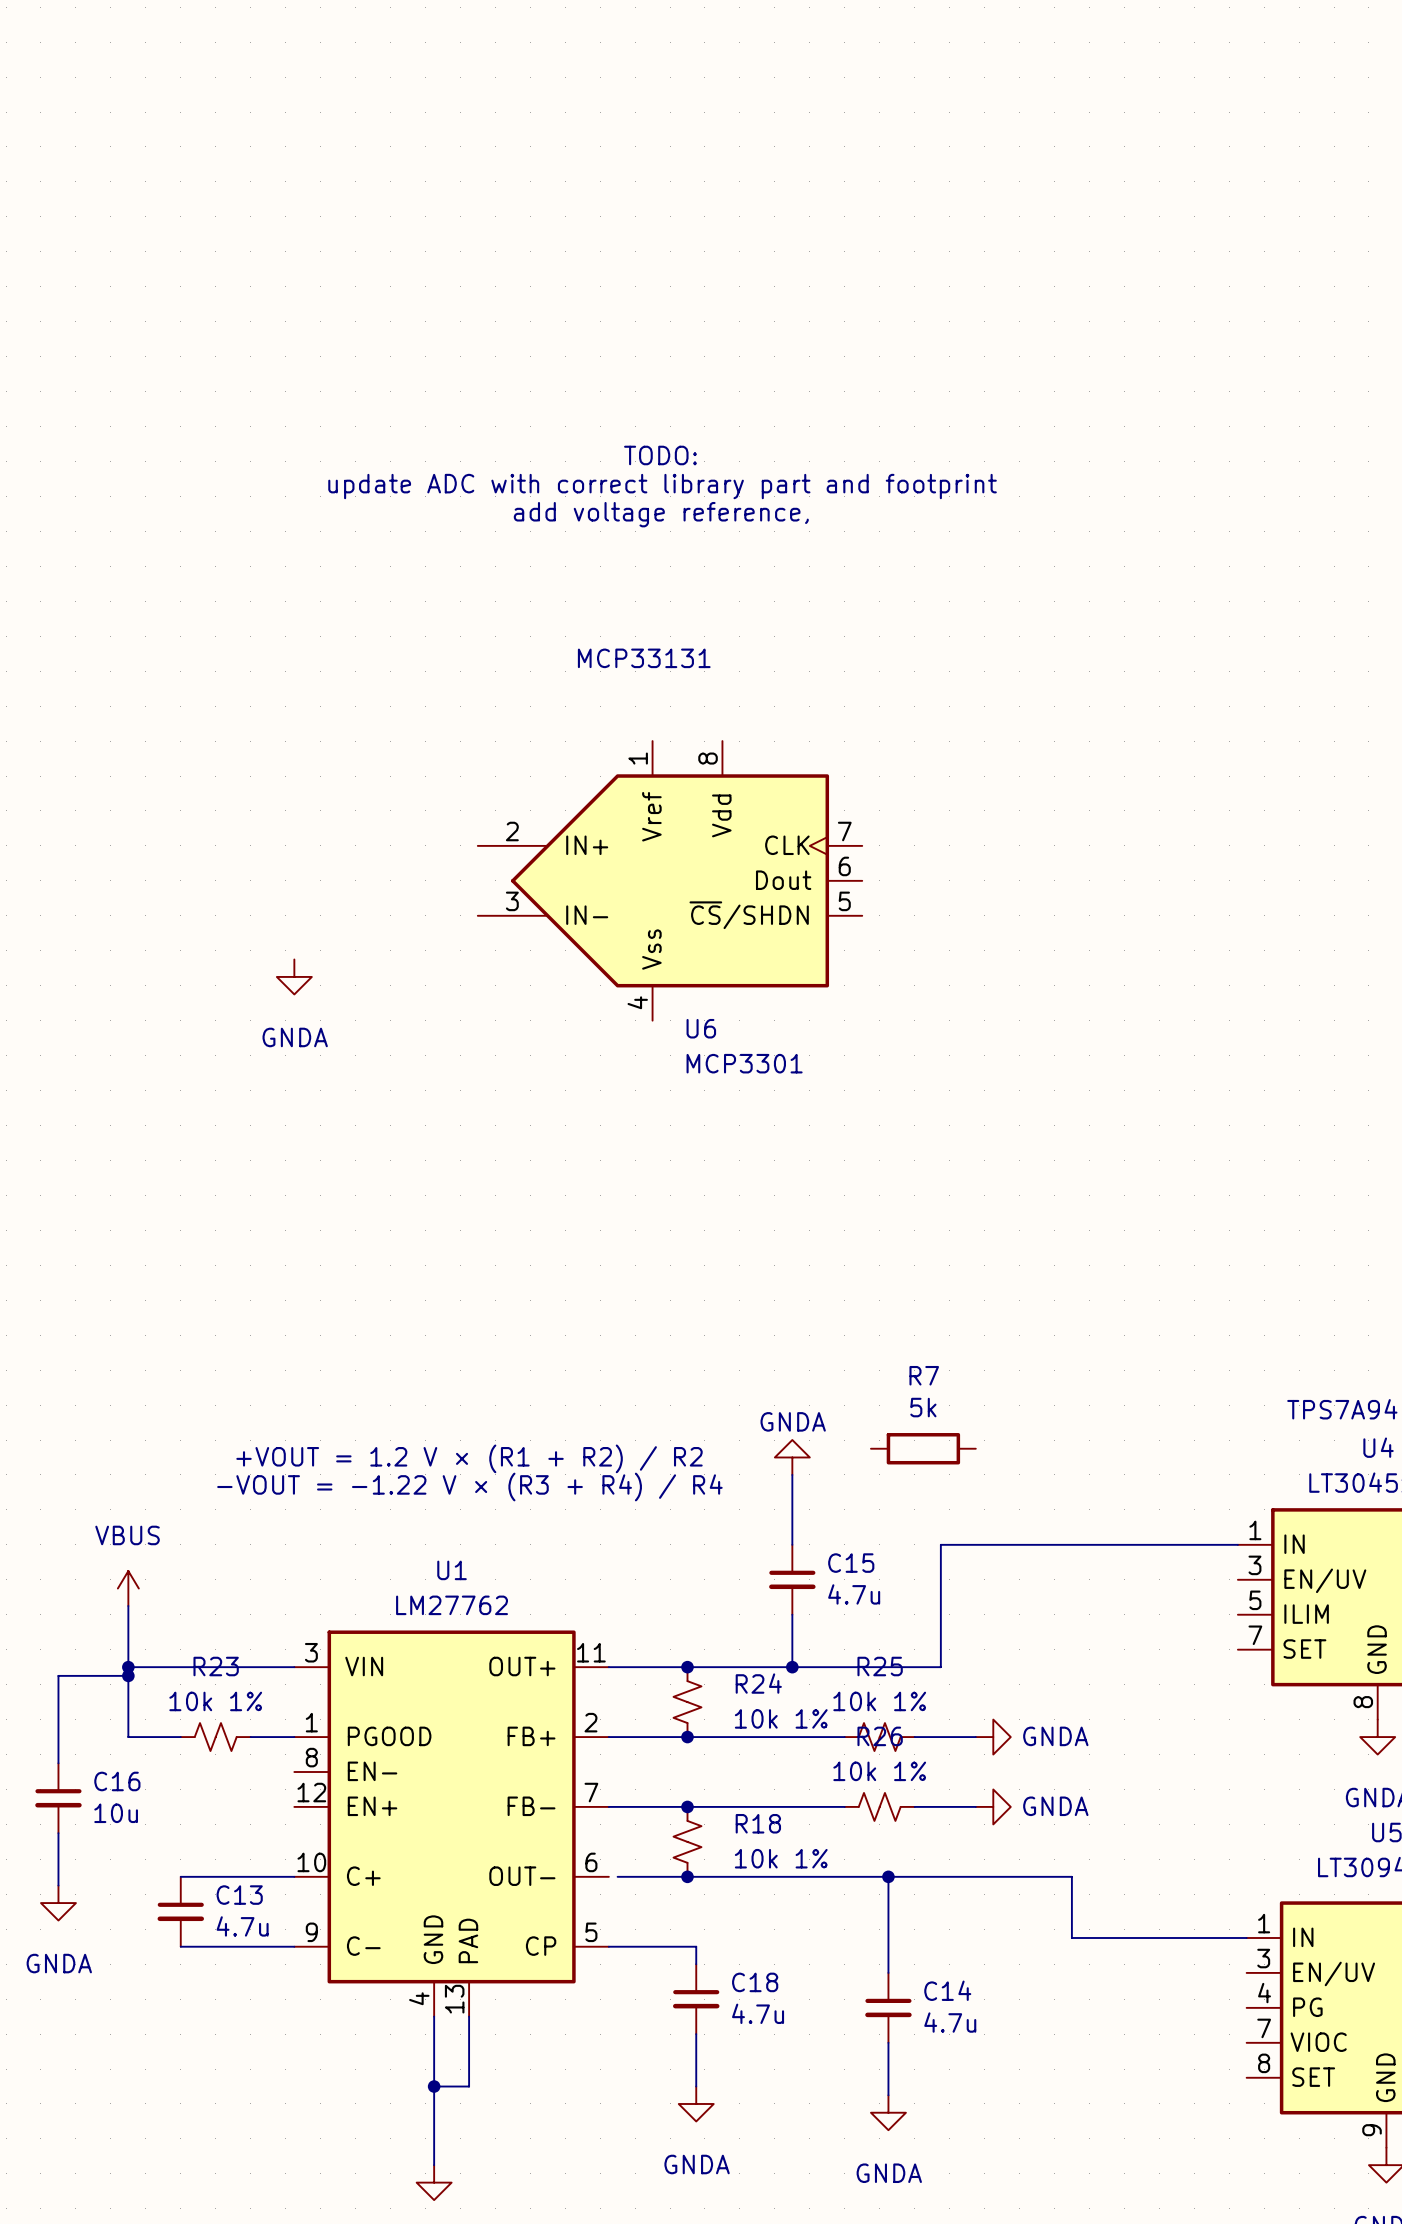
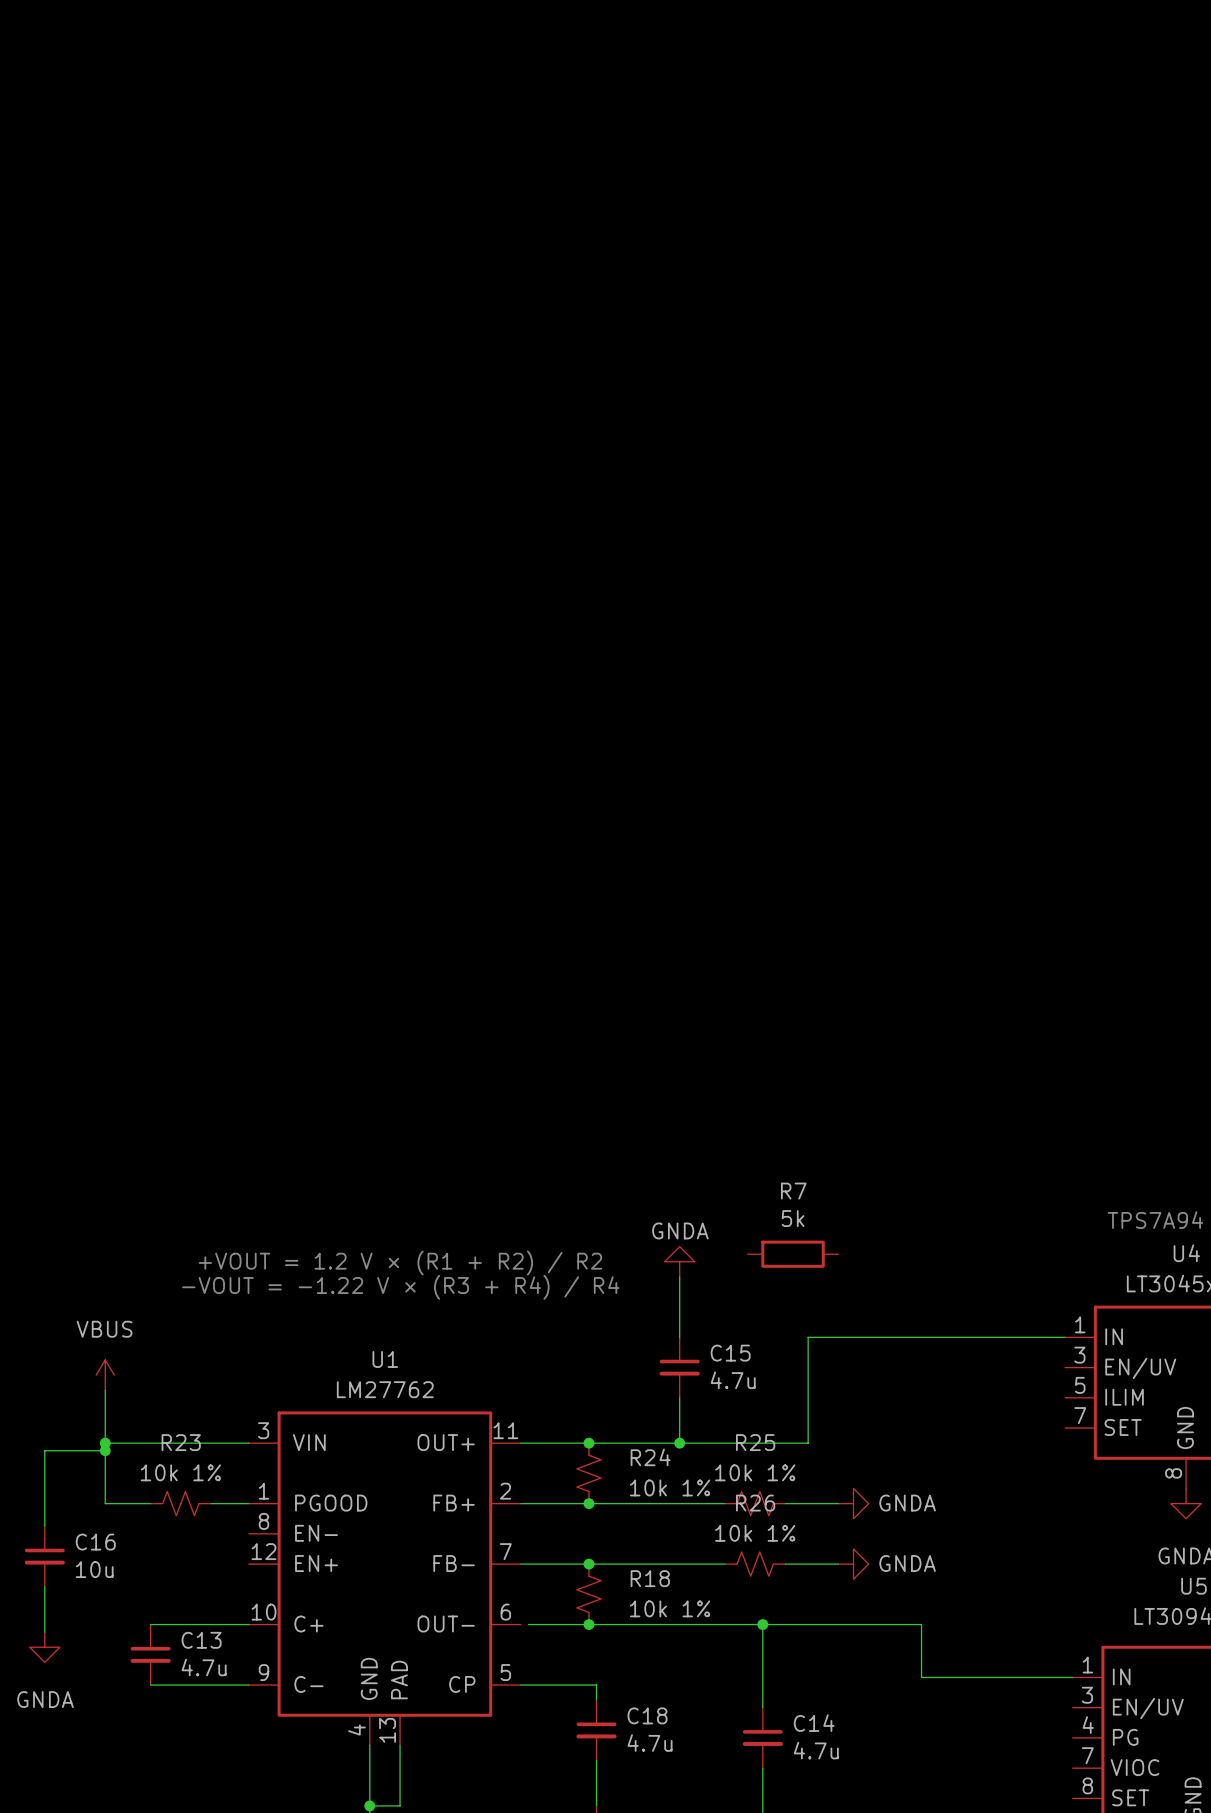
text: TODO: (660, 455) -> none
text: update ADC with correct library part and footprint (662, 486) -> none
text: add voltage reference, (661, 514) -> none
text: MCP33131 (644, 658) -> none
U6: MCP3301 (670, 880) -> none
power symbol: GNDA (294, 976) -> none

